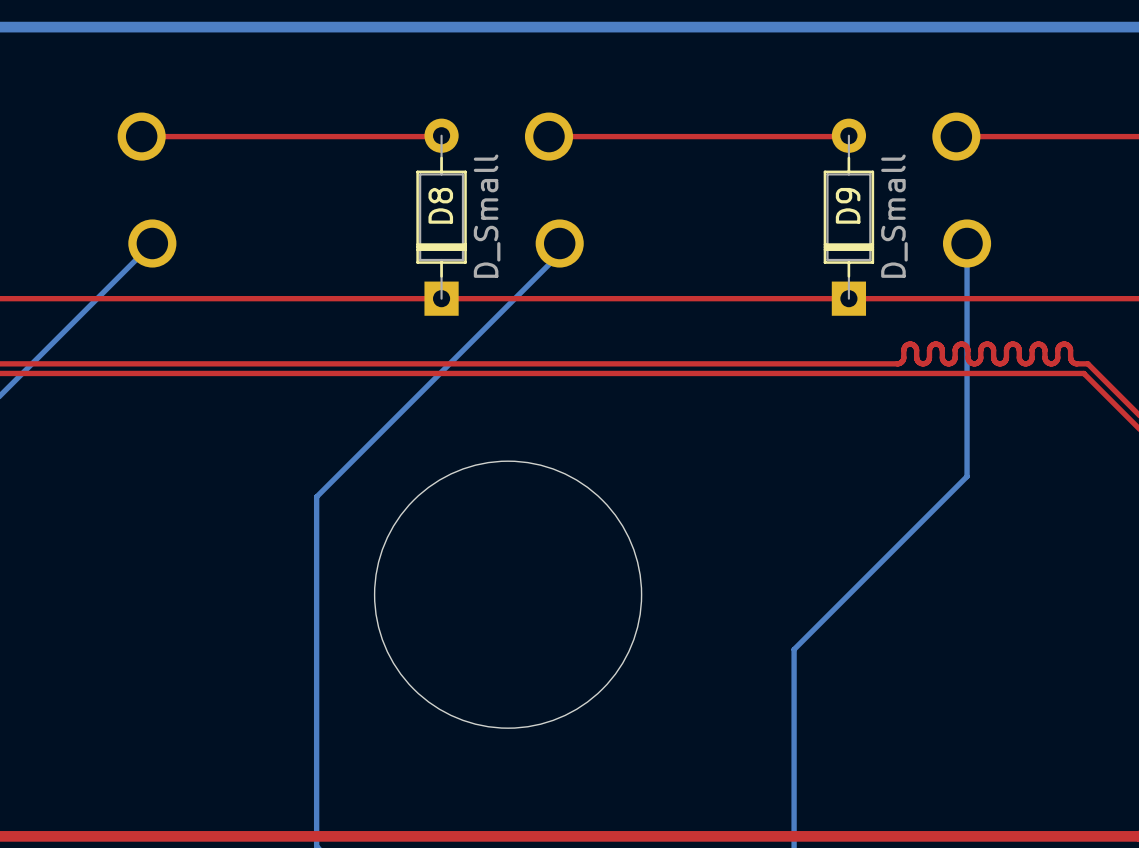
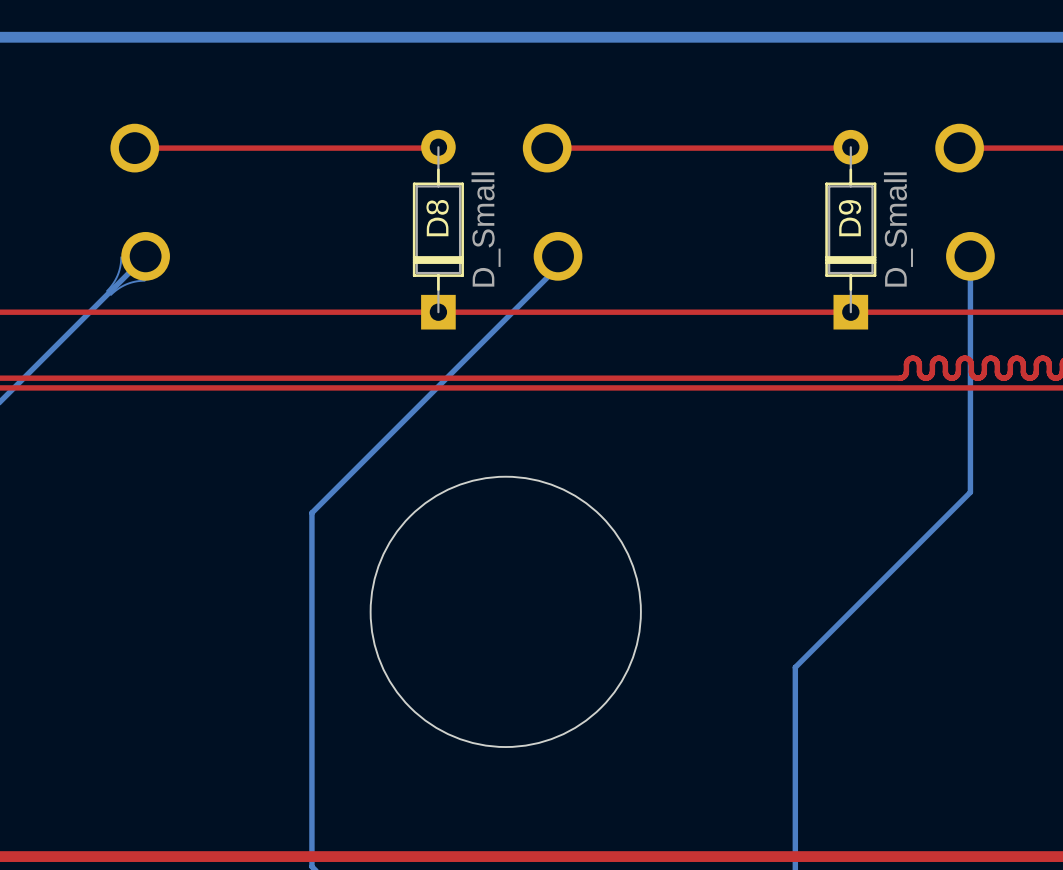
bottom zone outline: none -> (154, 247) (145, 280) (126, 284) (110, 295) (106, 291) (117, 275) (121, 256) (154, 247)

